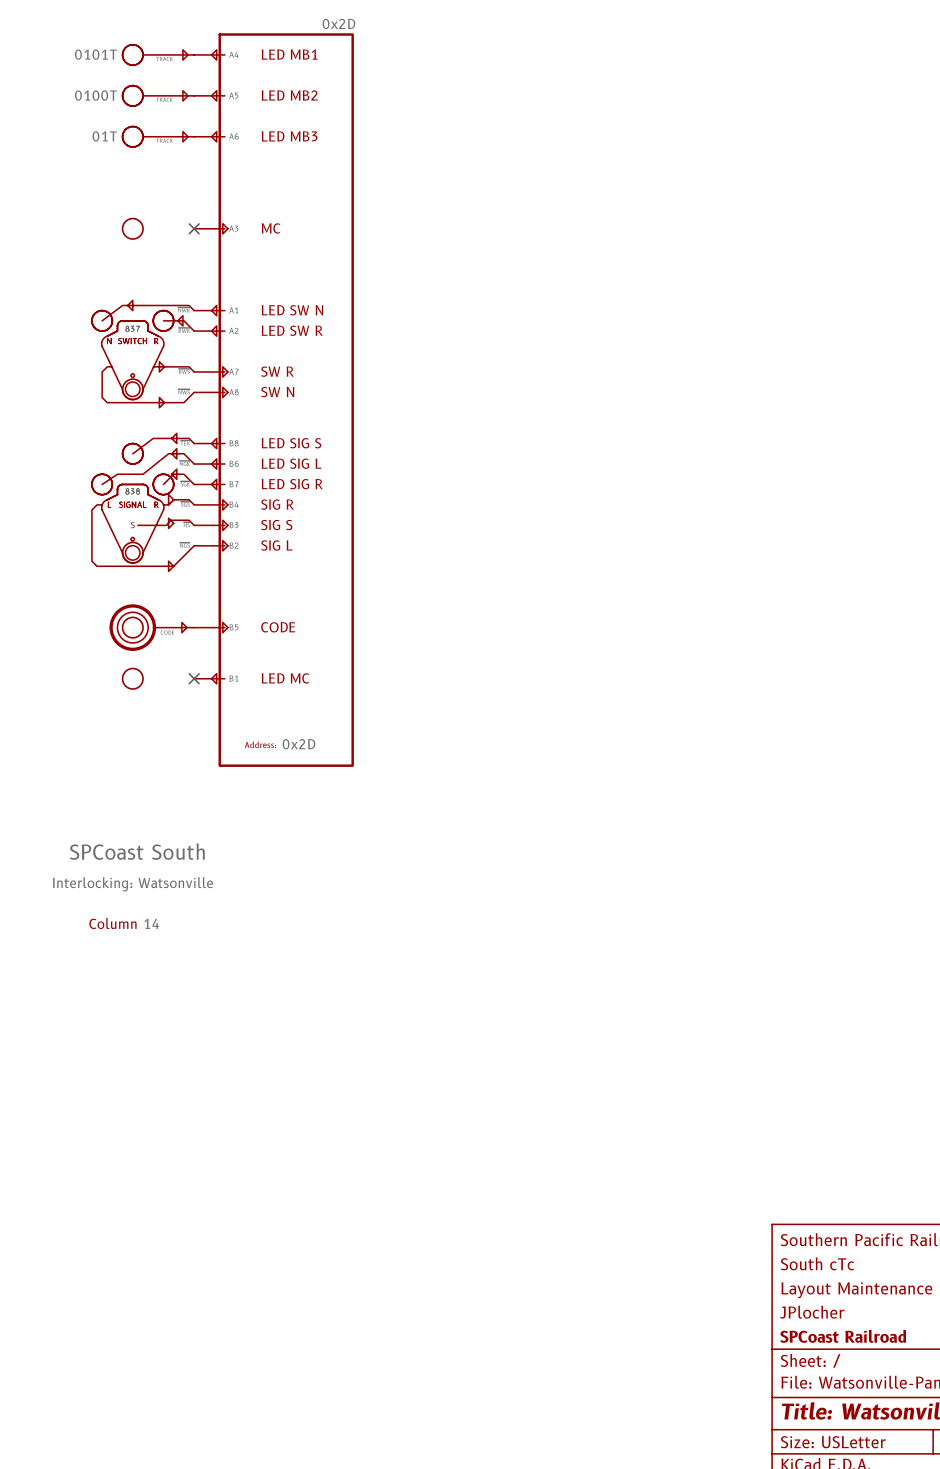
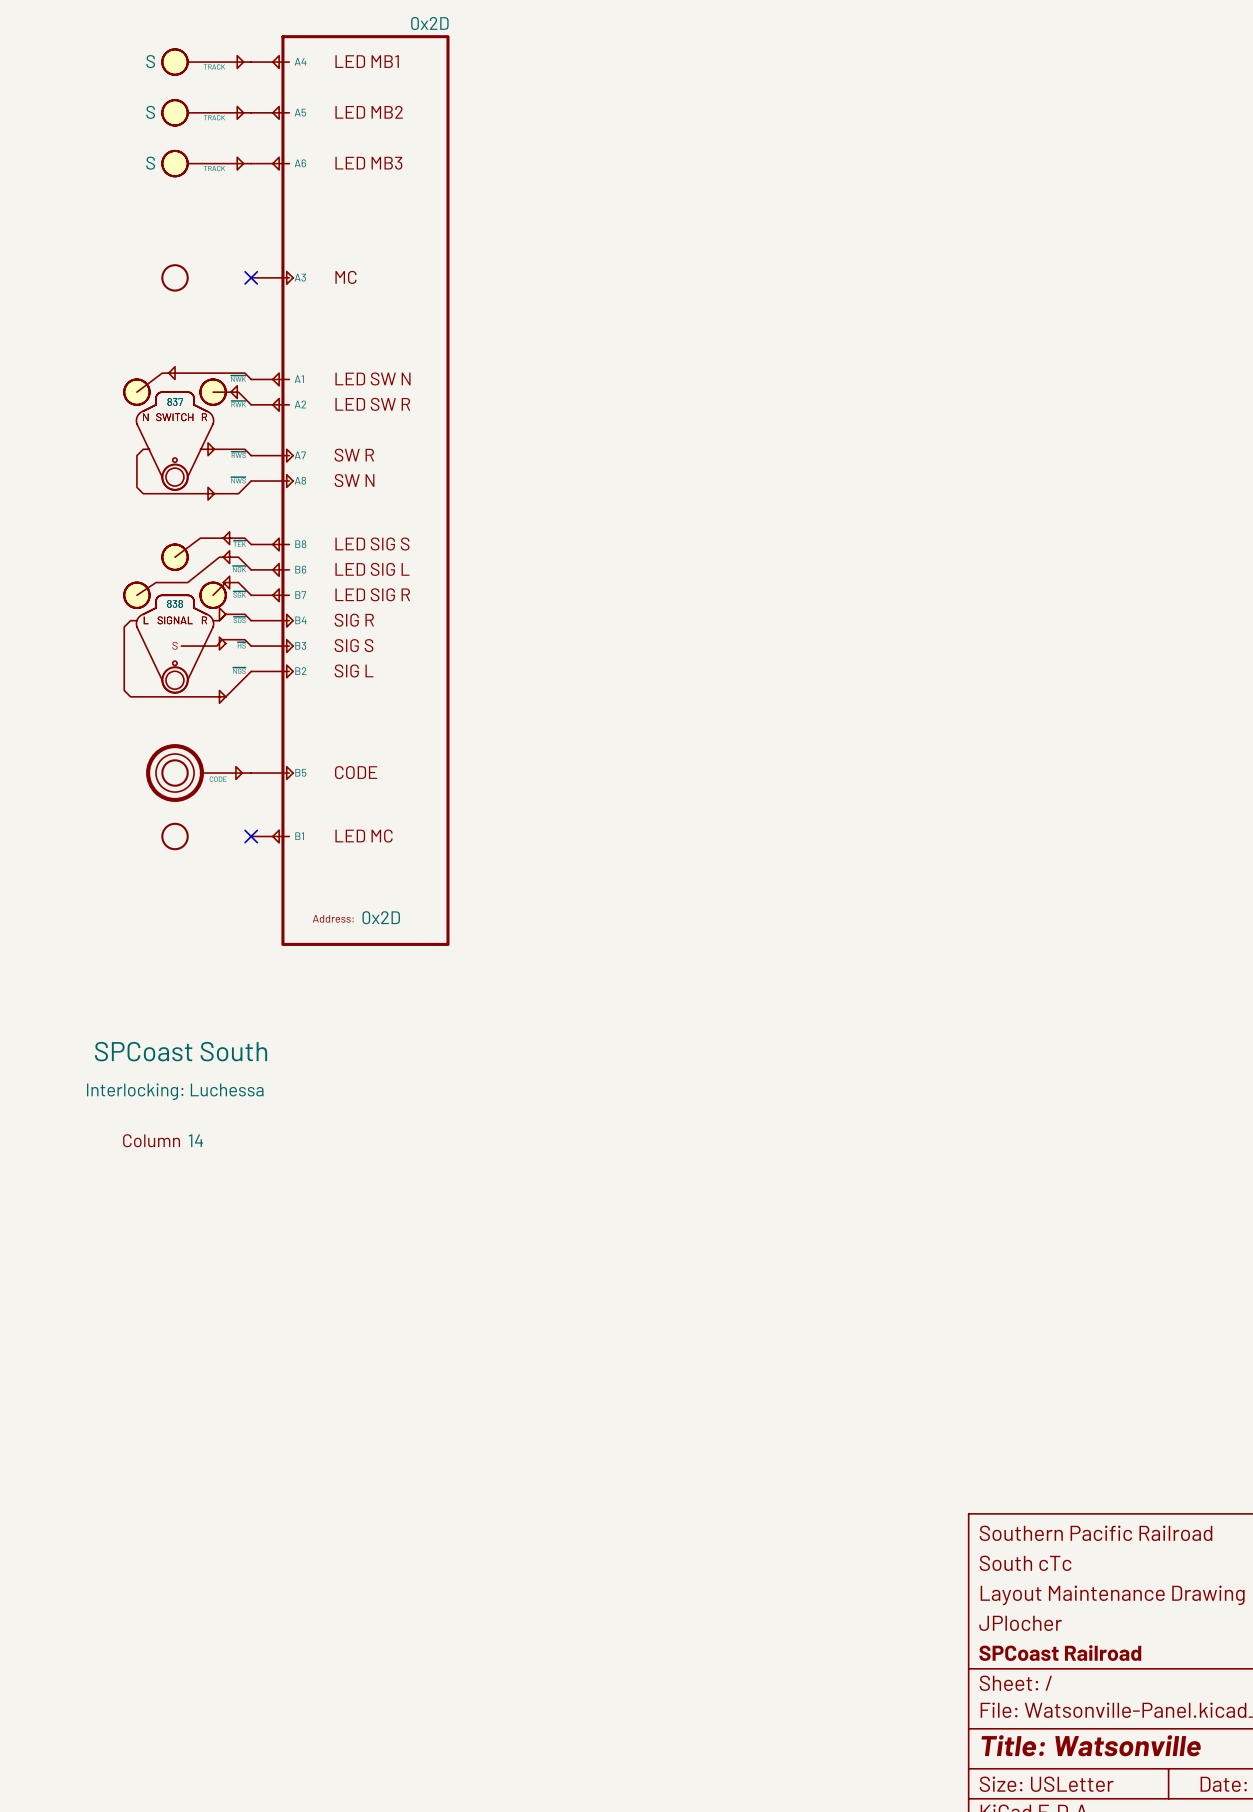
part text: 0101T (95, 54) -> S (150, 61)
part text: 0100T (95, 95) -> S (150, 112)
part text: 01T (104, 136) -> S (150, 163)
part text: Interlocking: Watsonville (132, 884) -> Interlocking: Luchessa (175, 1091)

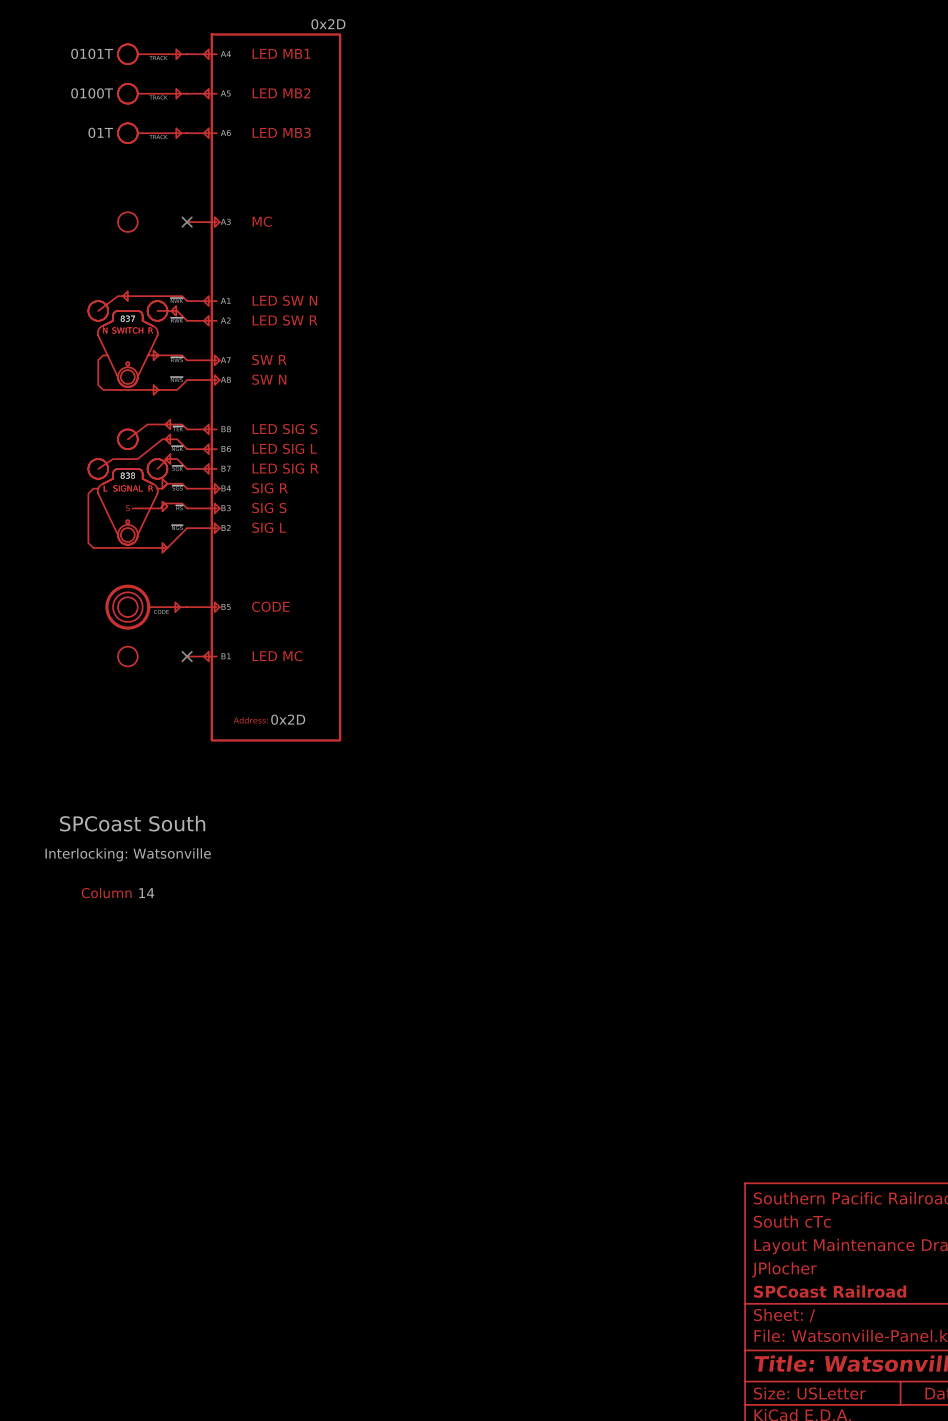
part text: S (150, 61) -> 0101T (92, 53)
part text: S (150, 112) -> 0100T (92, 93)
part text: S (150, 163) -> 01T (100, 132)
part text: Interlocking: Luchessa (175, 1091) -> Interlocking: Watsonville (128, 854)

